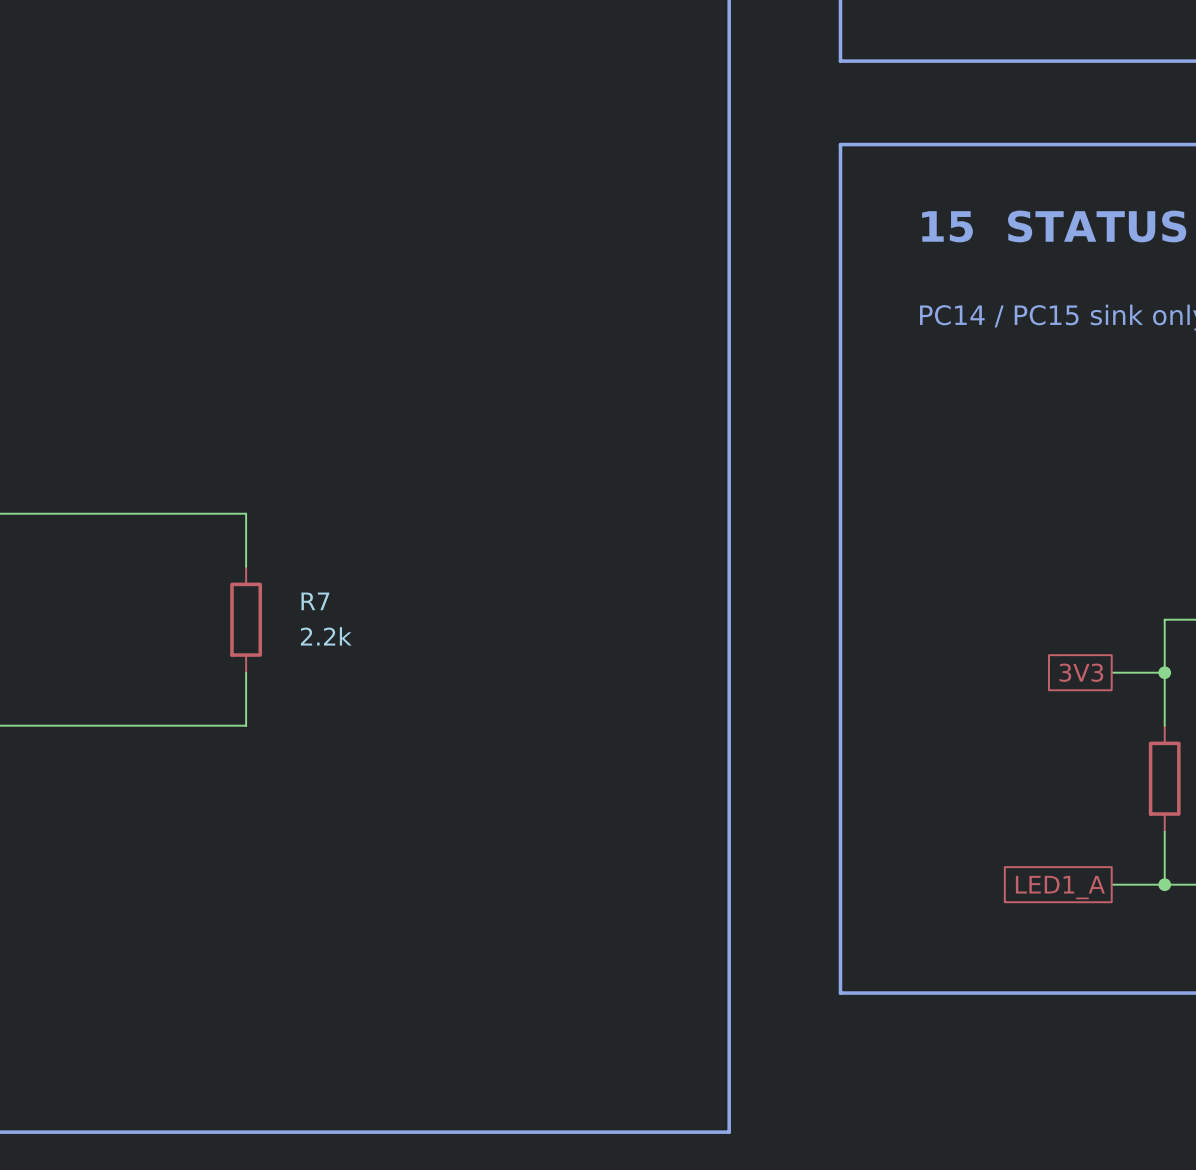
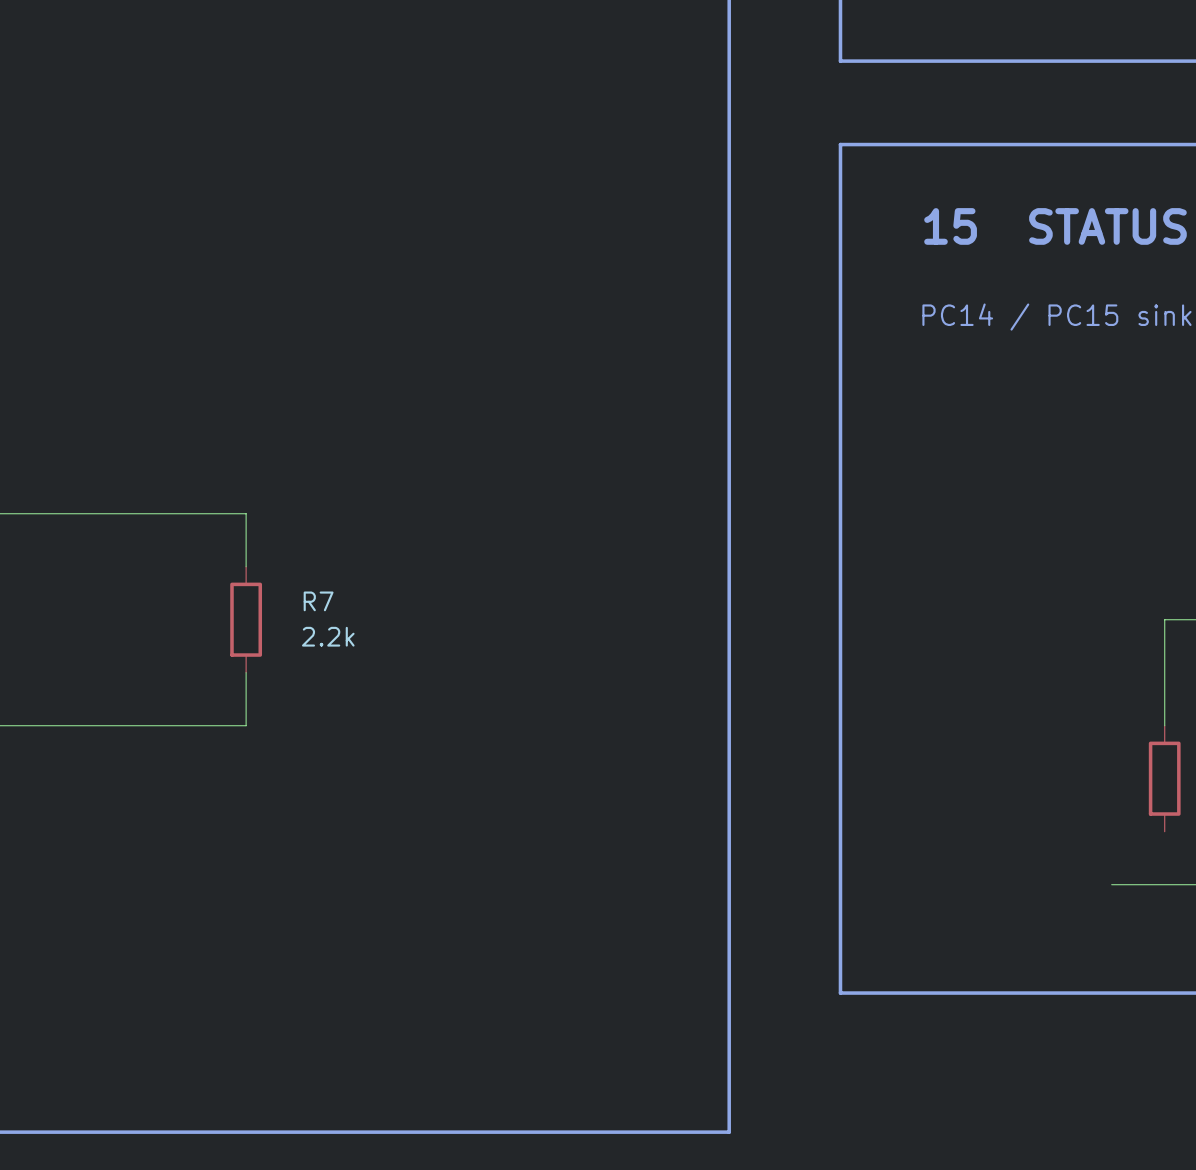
global label: 3V3 (1081, 672) -> none
wire: (1111, 672) (1164, 672) -> none
junction: (1164, 672) -> none
wire: (1164, 831) (1164, 884) -> none
junction: (1164, 884) -> none
global label: LED1_A (1060, 887) -> none

